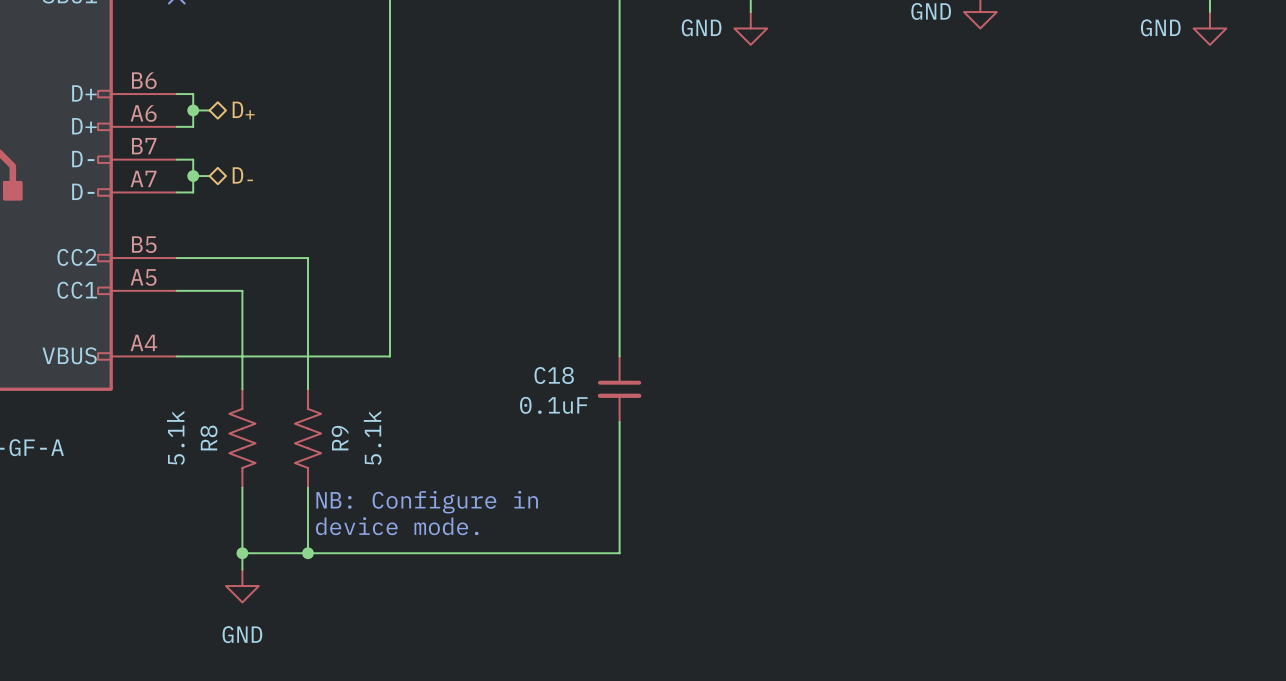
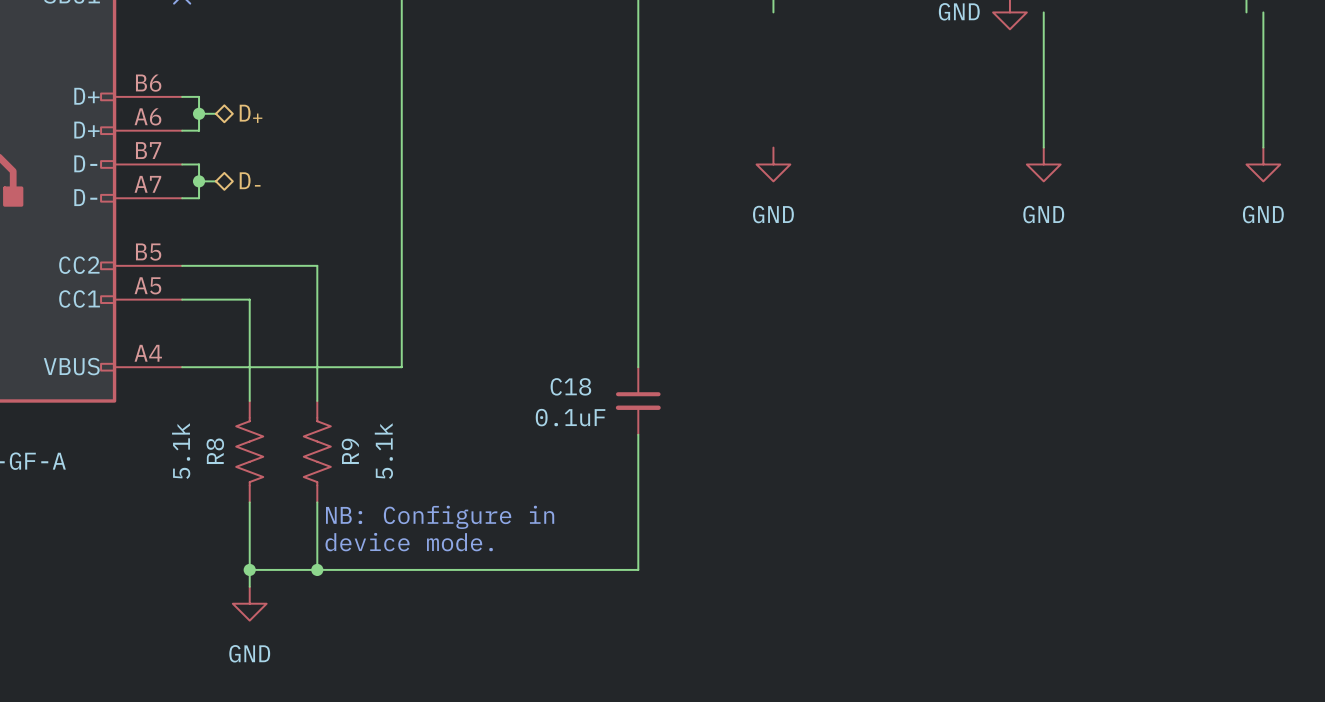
wire: none -> (1043, 12) (1043, 147)
wire: none -> (1263, 12) (1263, 147)
power symbol text position: GND (701, 27) -> GND (773, 214)
power symbol position: GND (750, 28) -> GND (773, 164)
power symbol: GND (1209, 28) -> none
power symbol: none -> GND (1043, 164)
power symbol: none -> GND (1263, 164)

